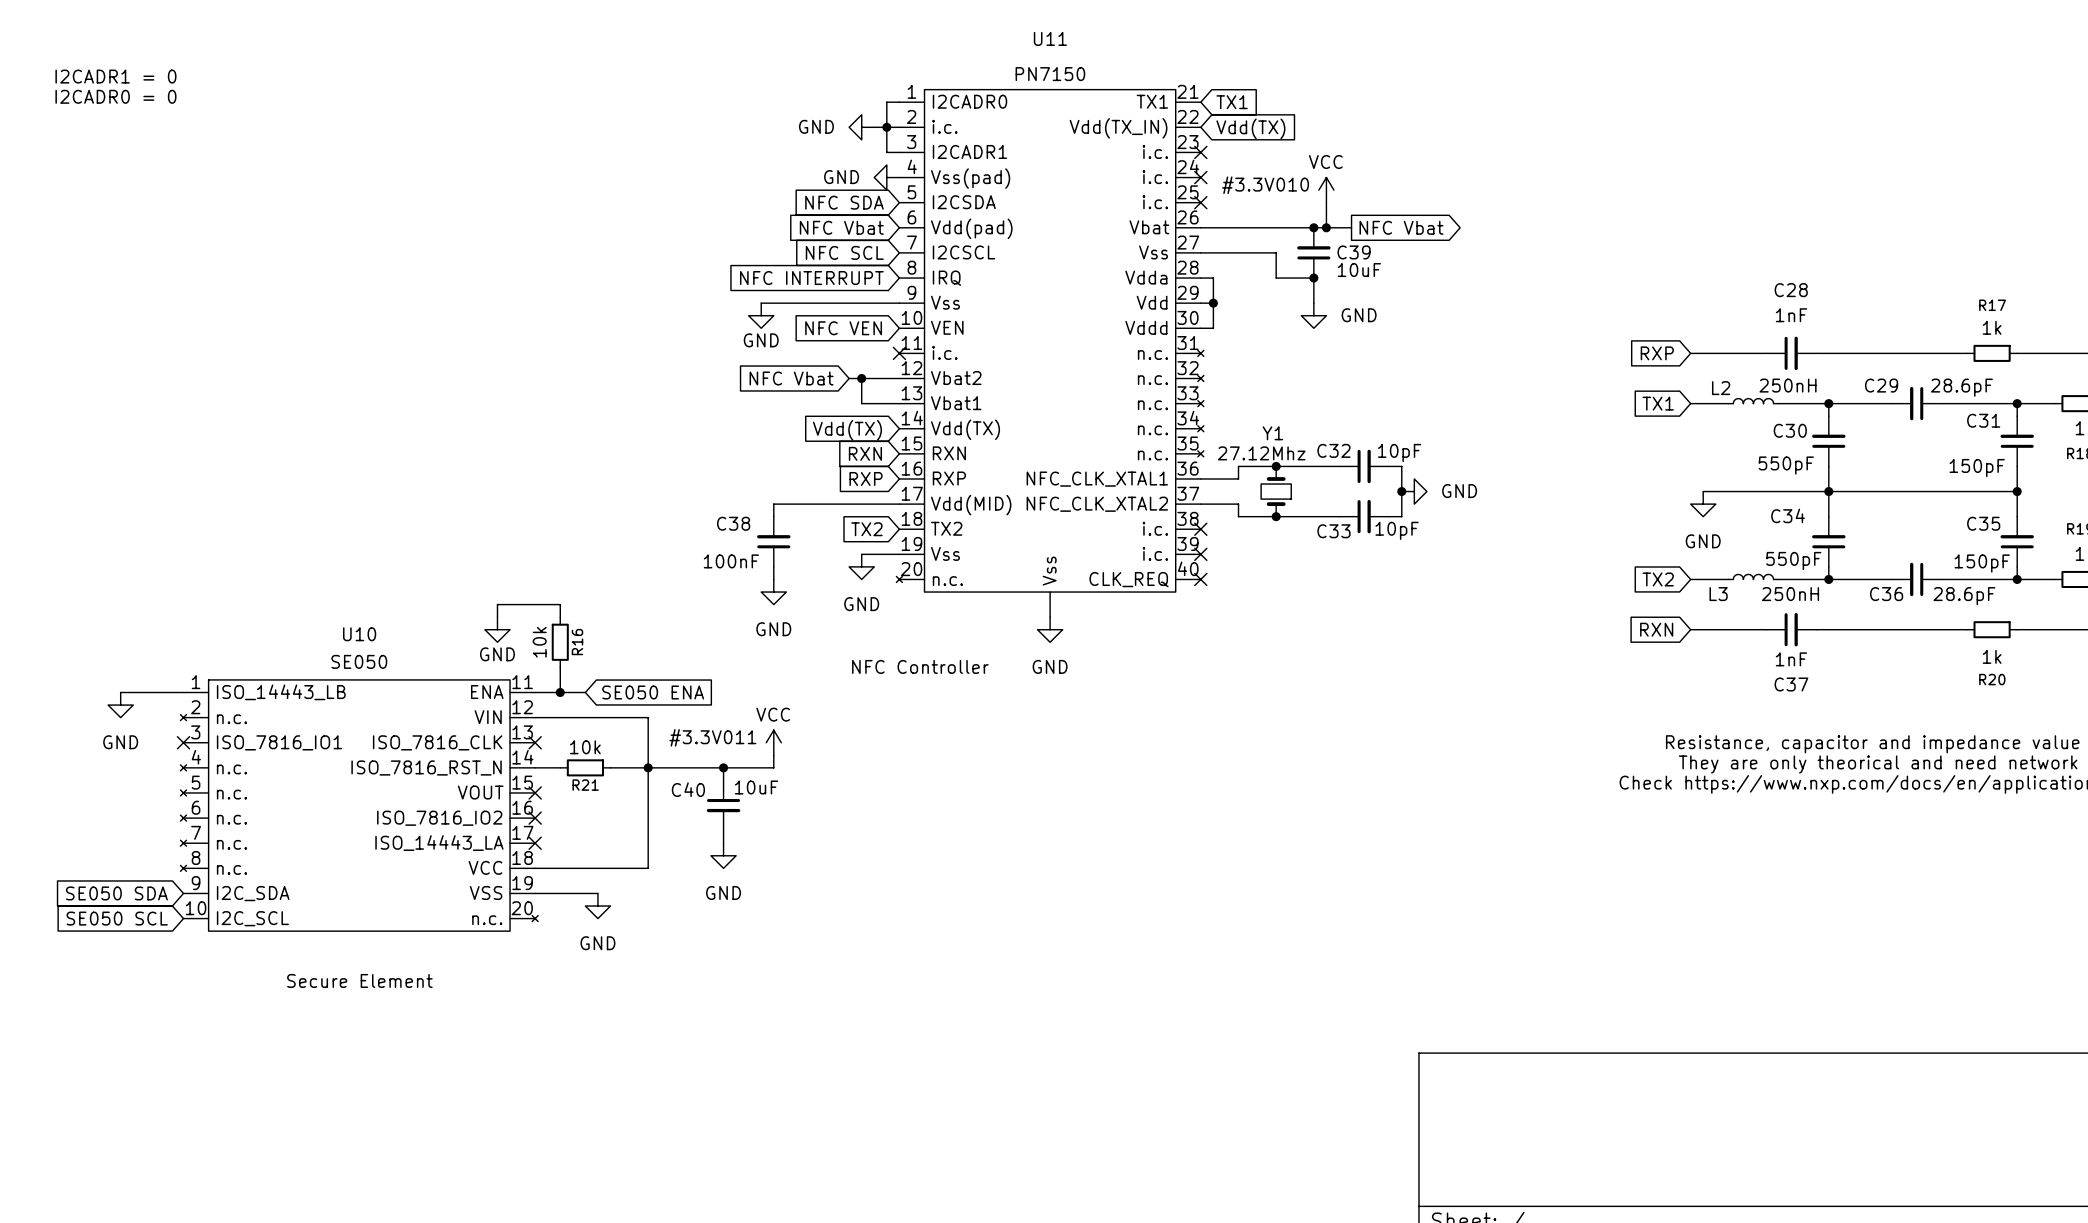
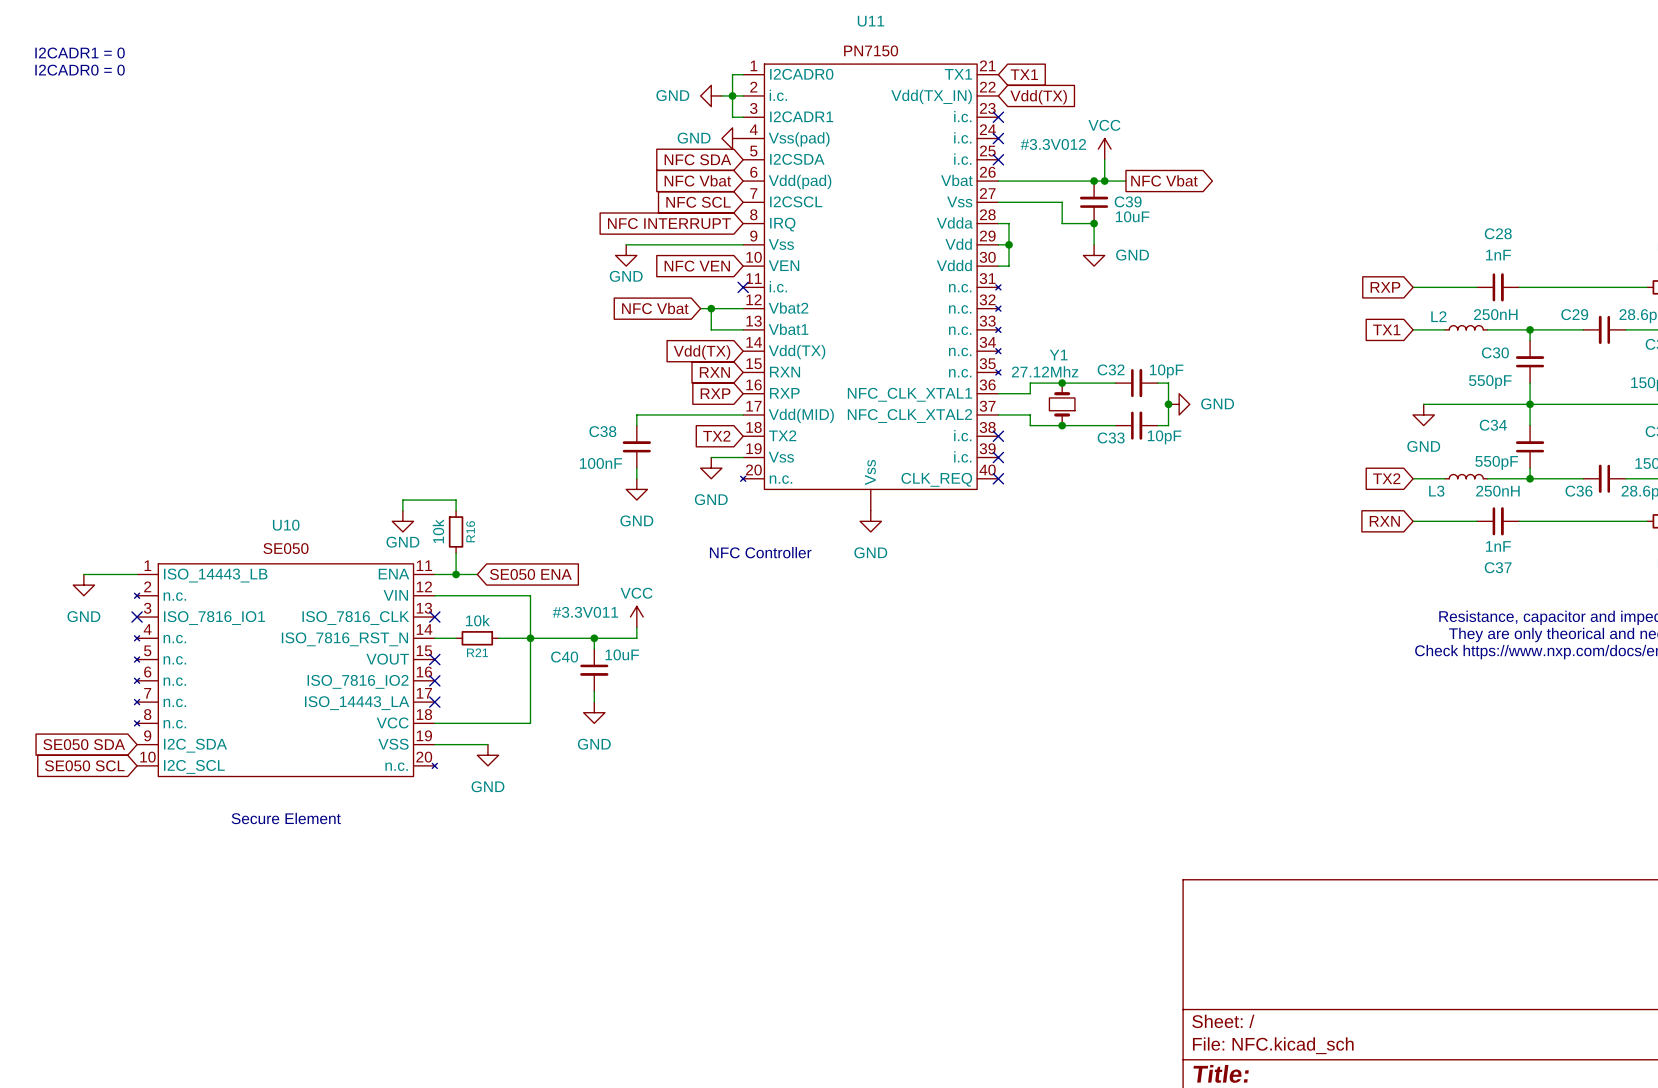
#3.3V010 name: #3.3V010 (1265, 185) -> #3.3V012 (1053, 144)

